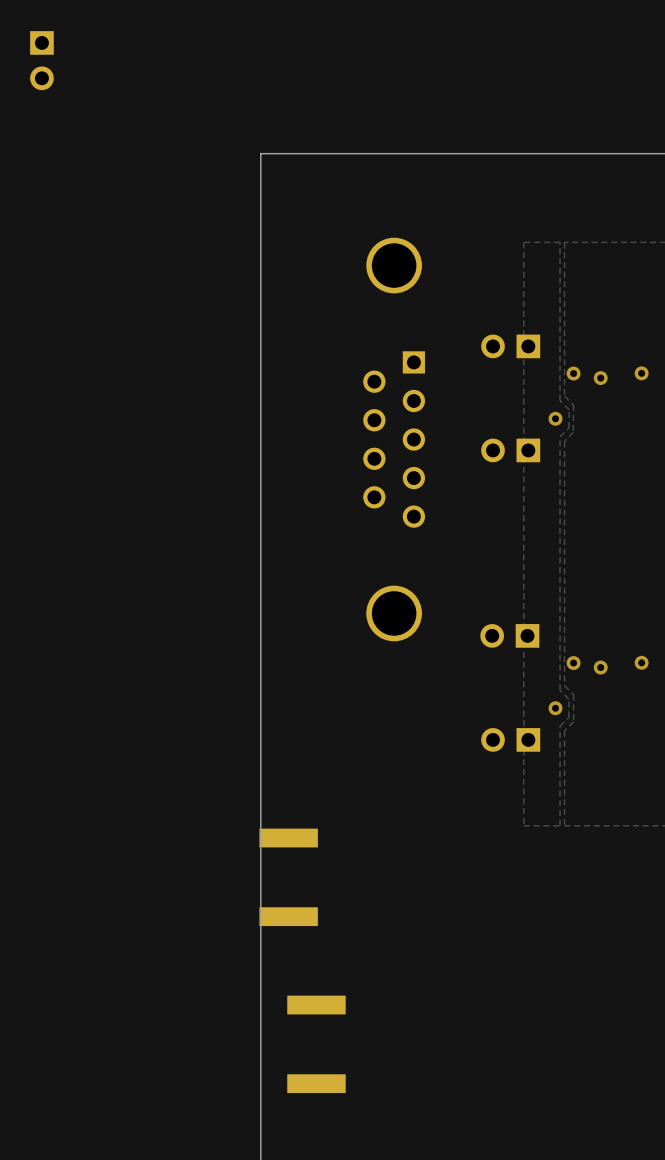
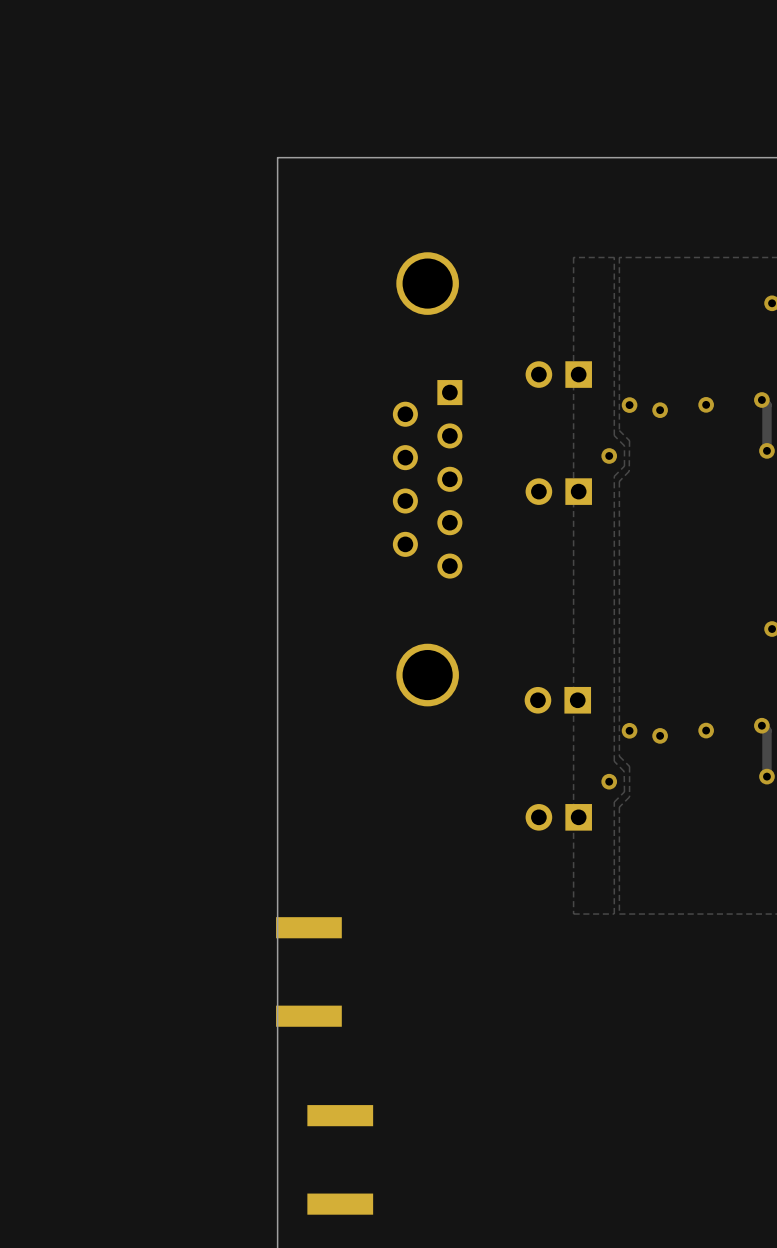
part: (41, 60) -> none

